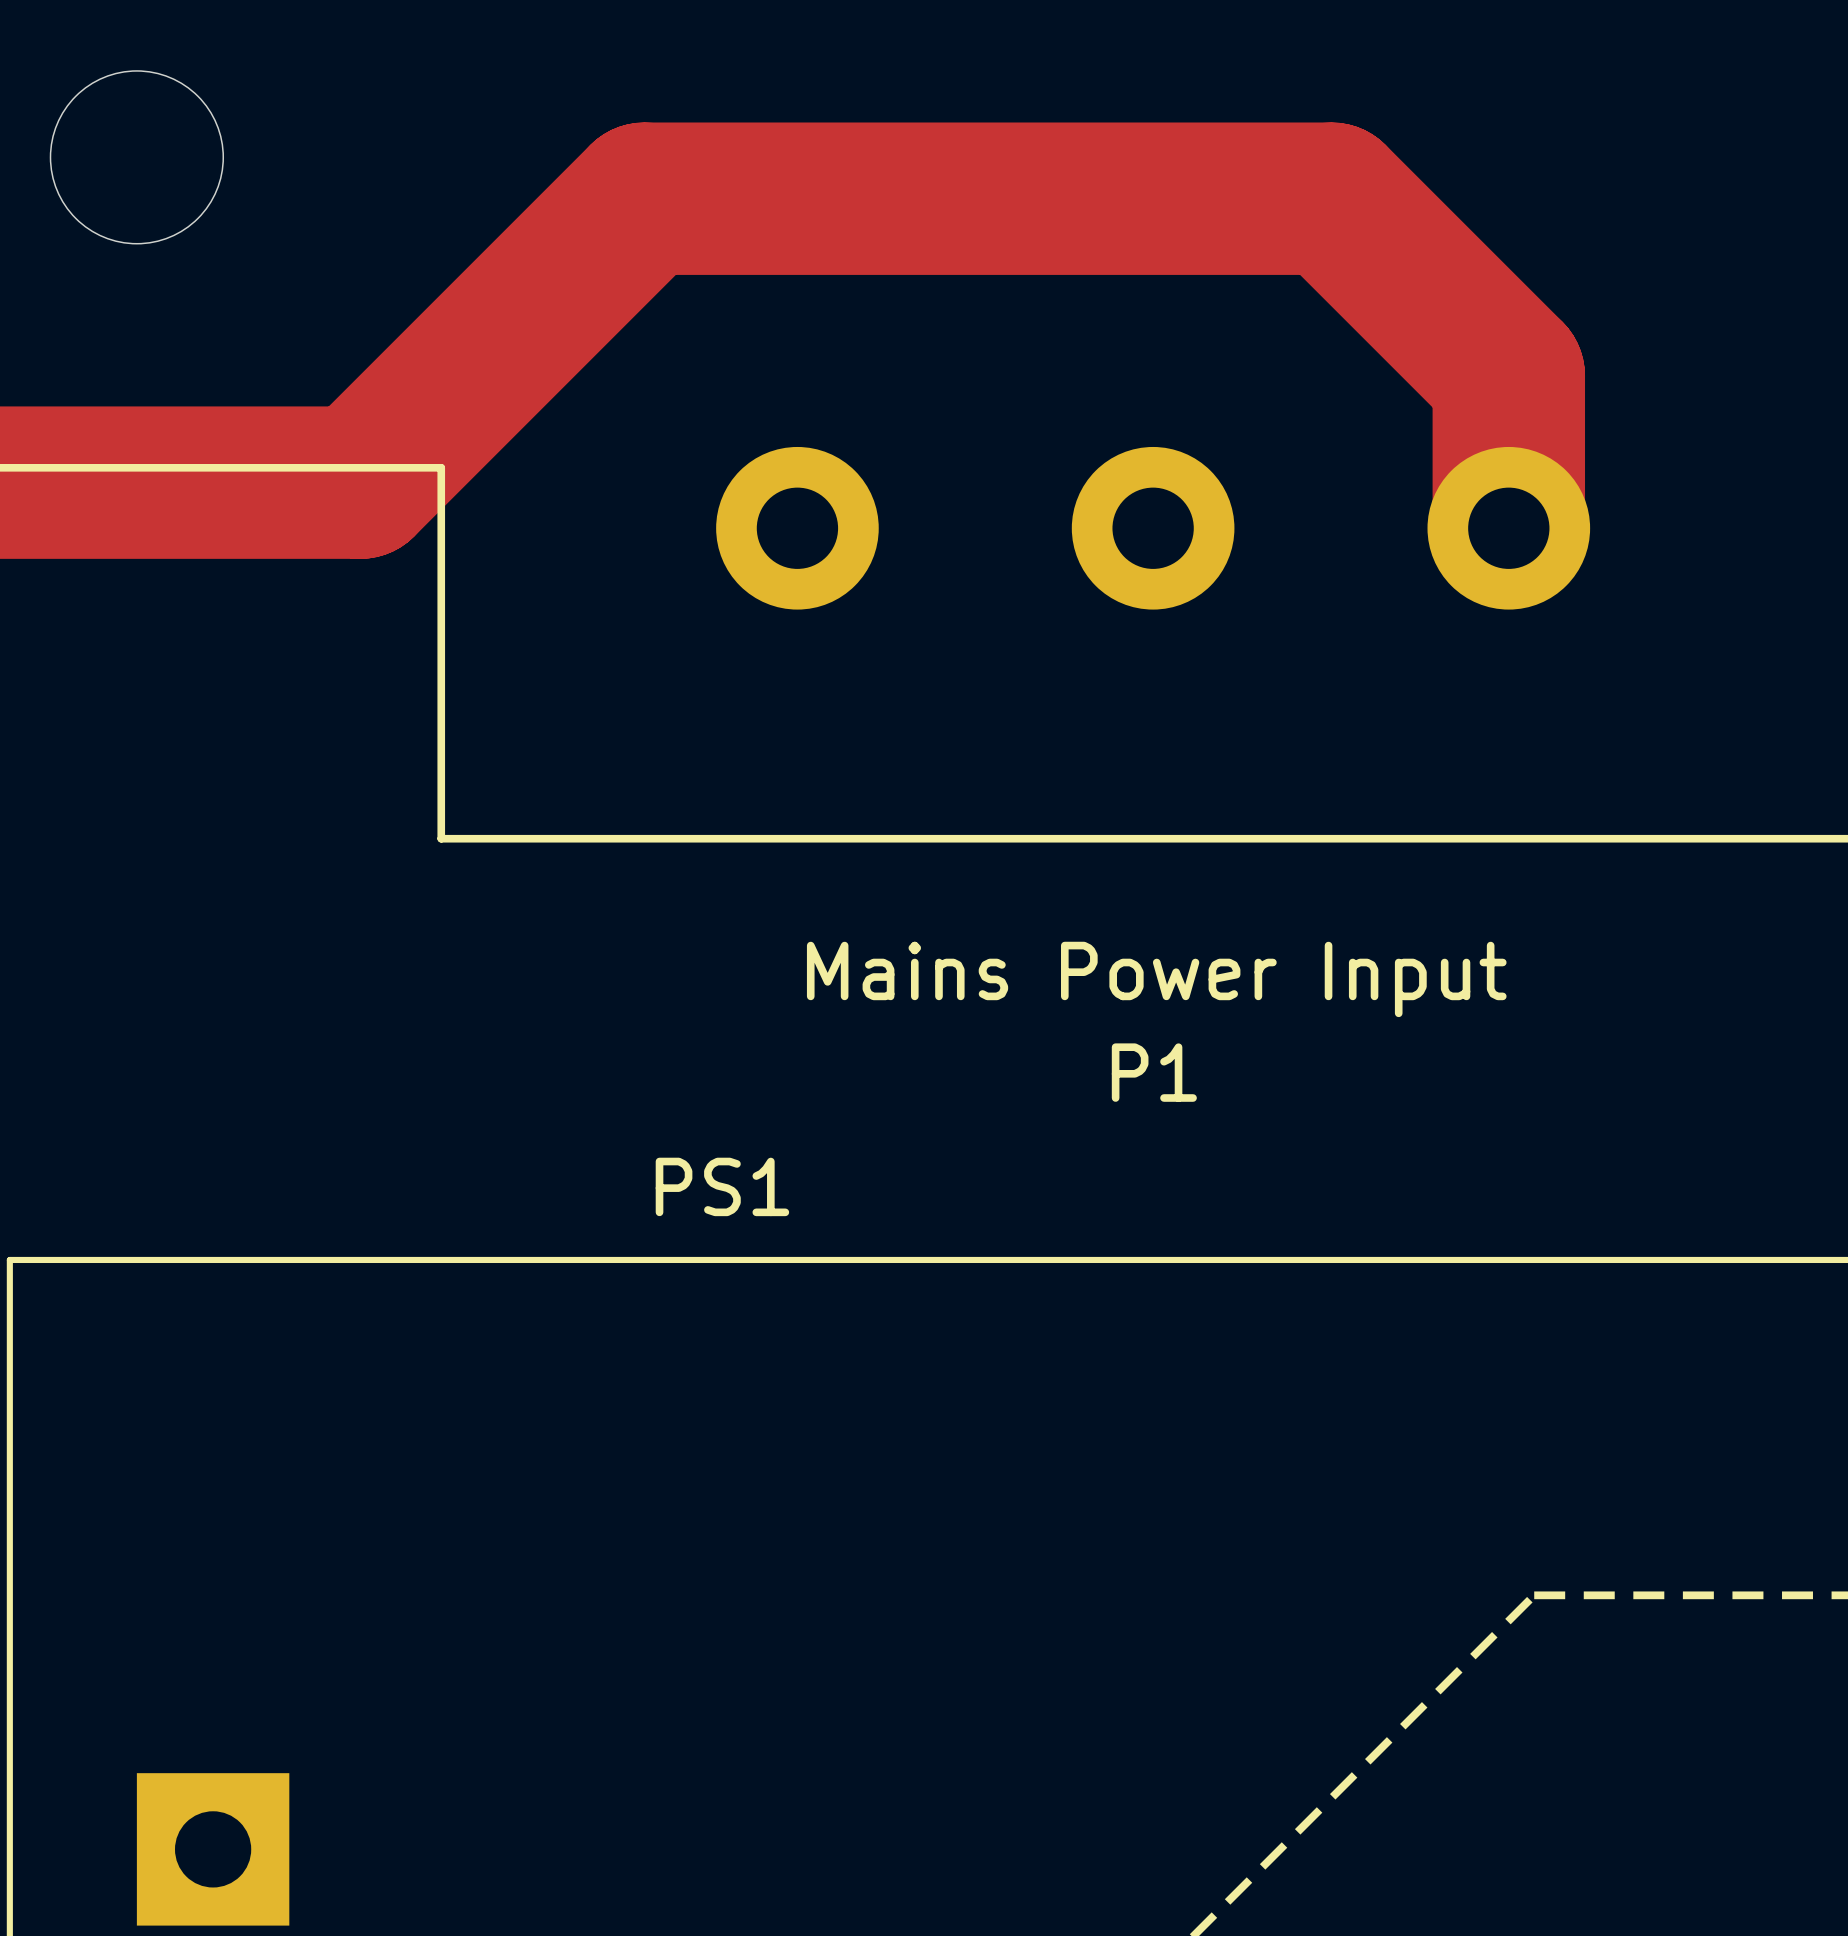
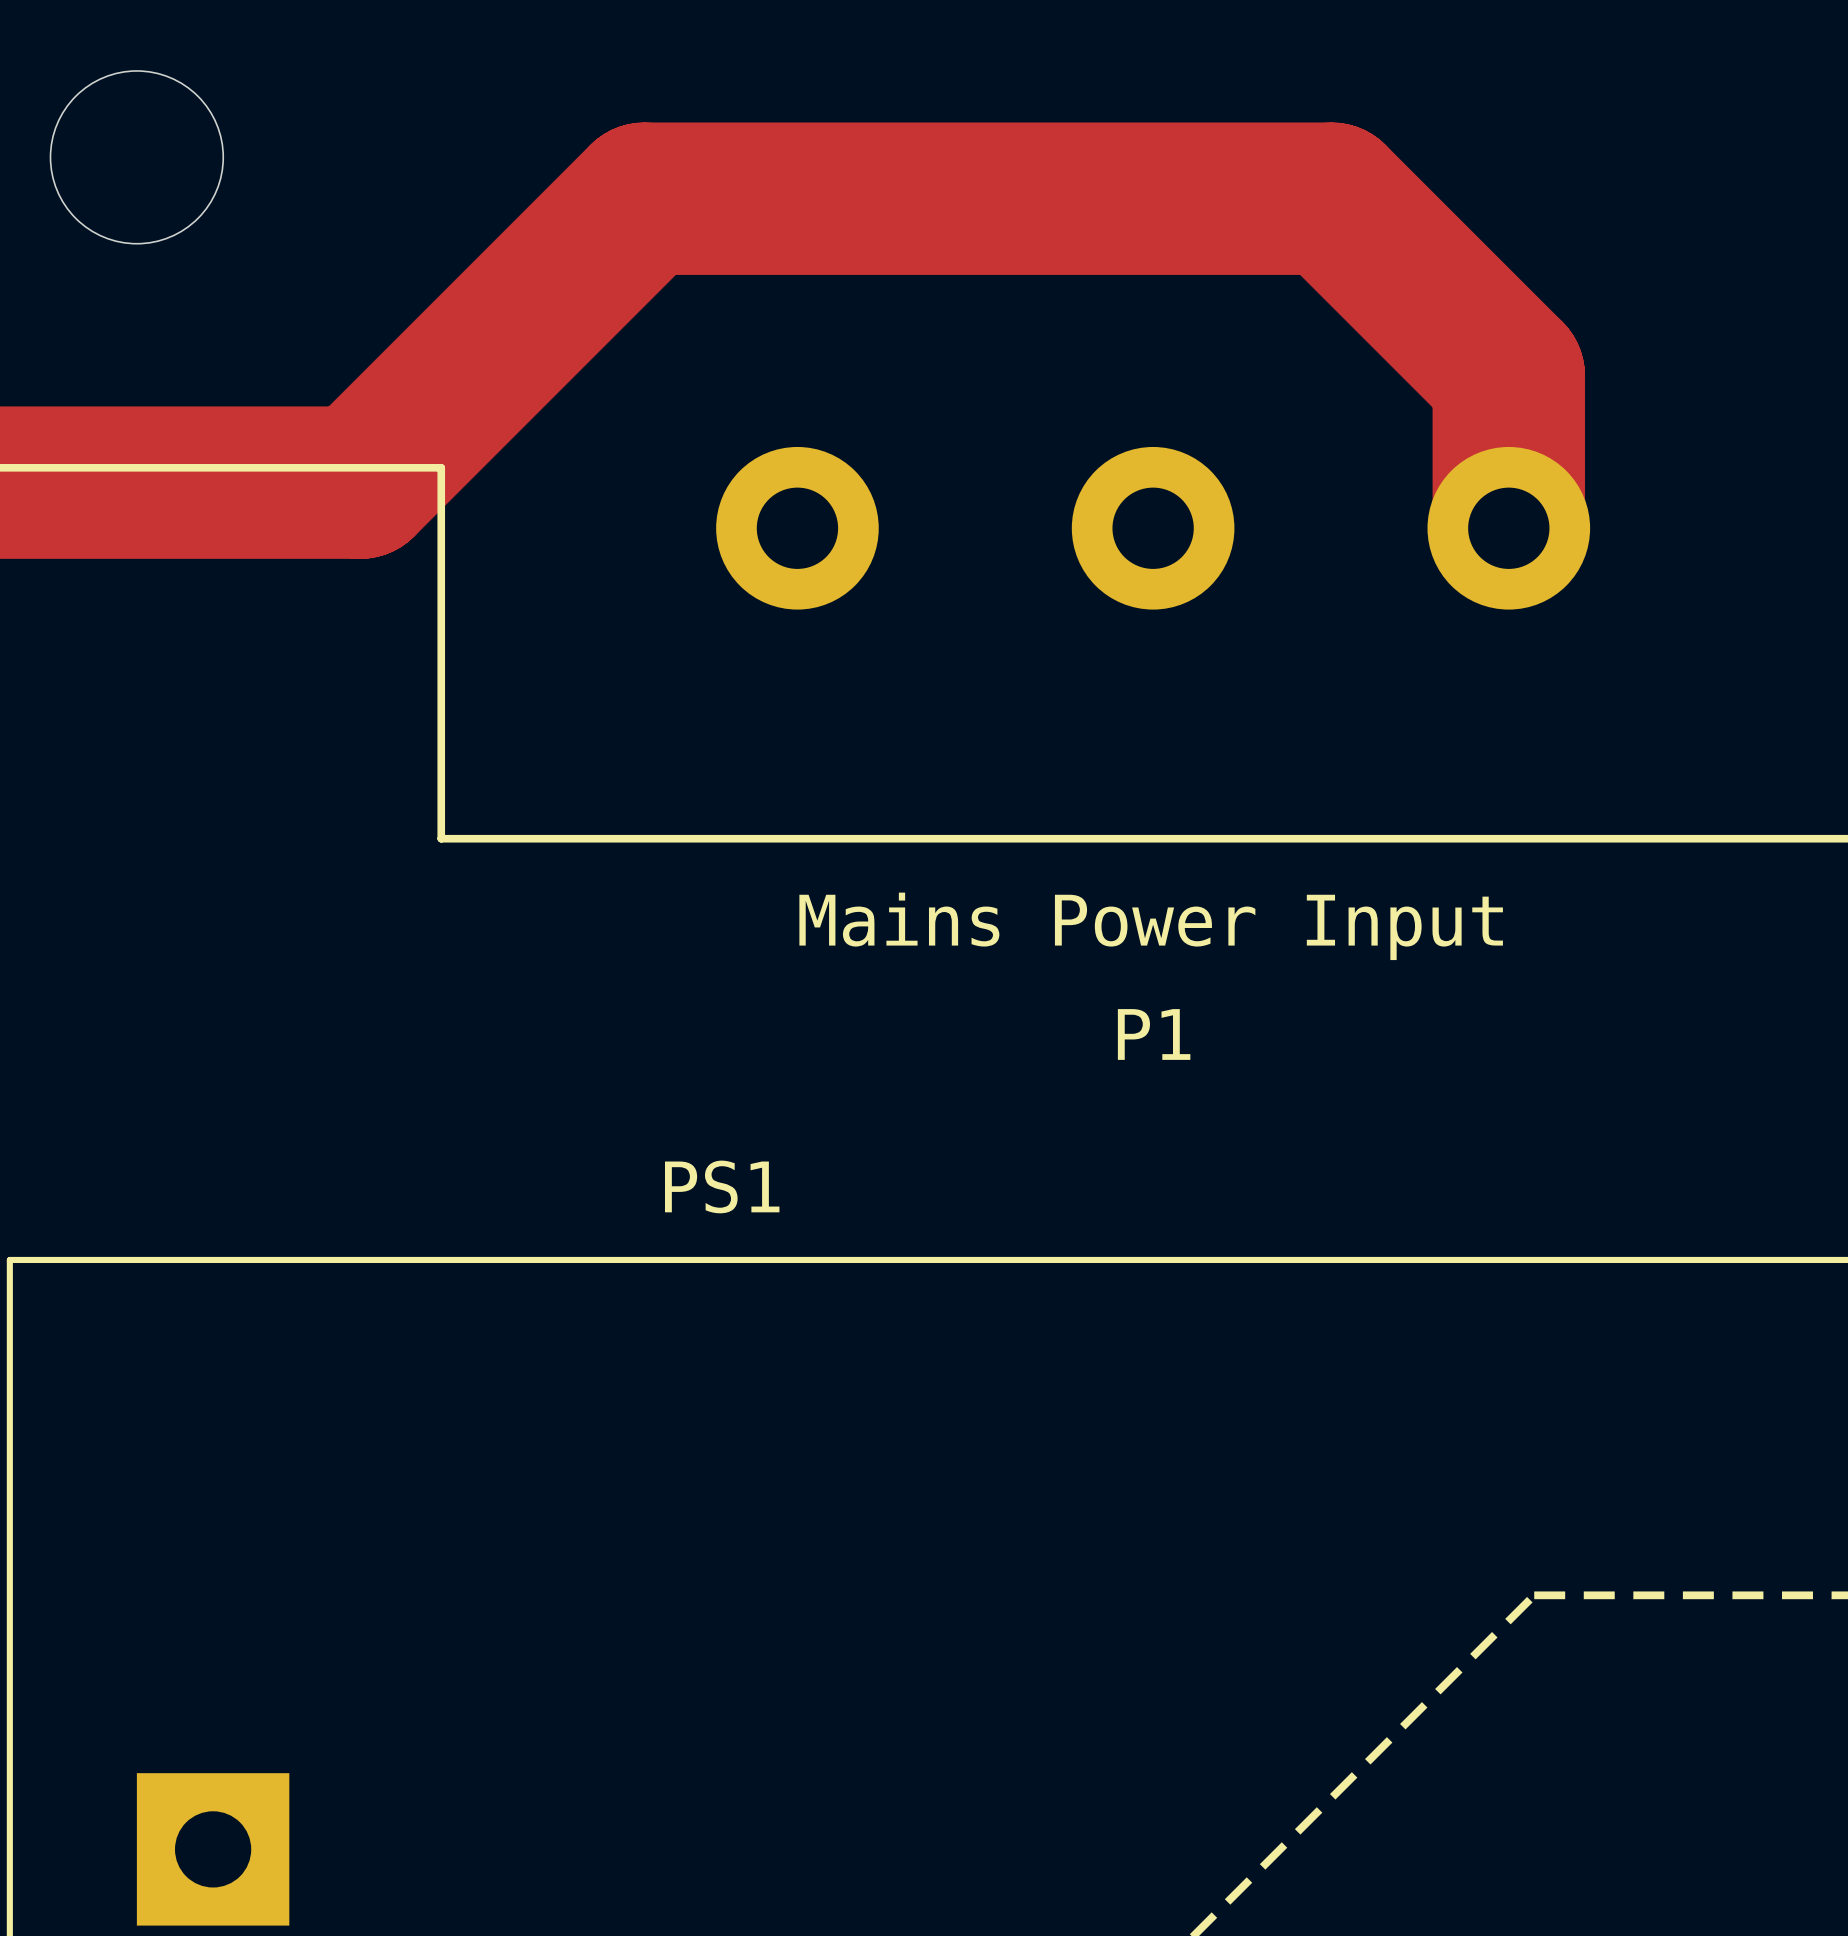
text position: Mains Power Input (1156, 979) -> Mains Power Input (1151, 926)
P1 name position: P1 (1154, 1072) -> P1 (1154, 1034)

